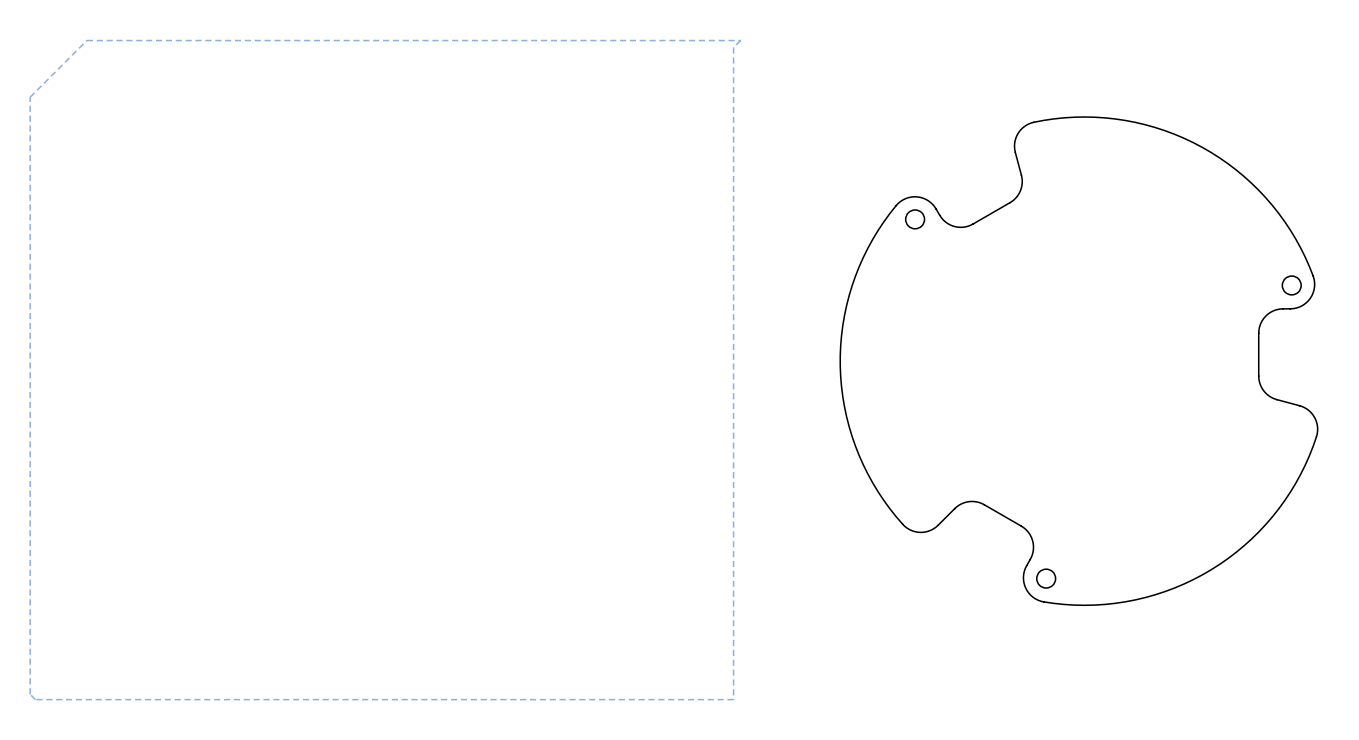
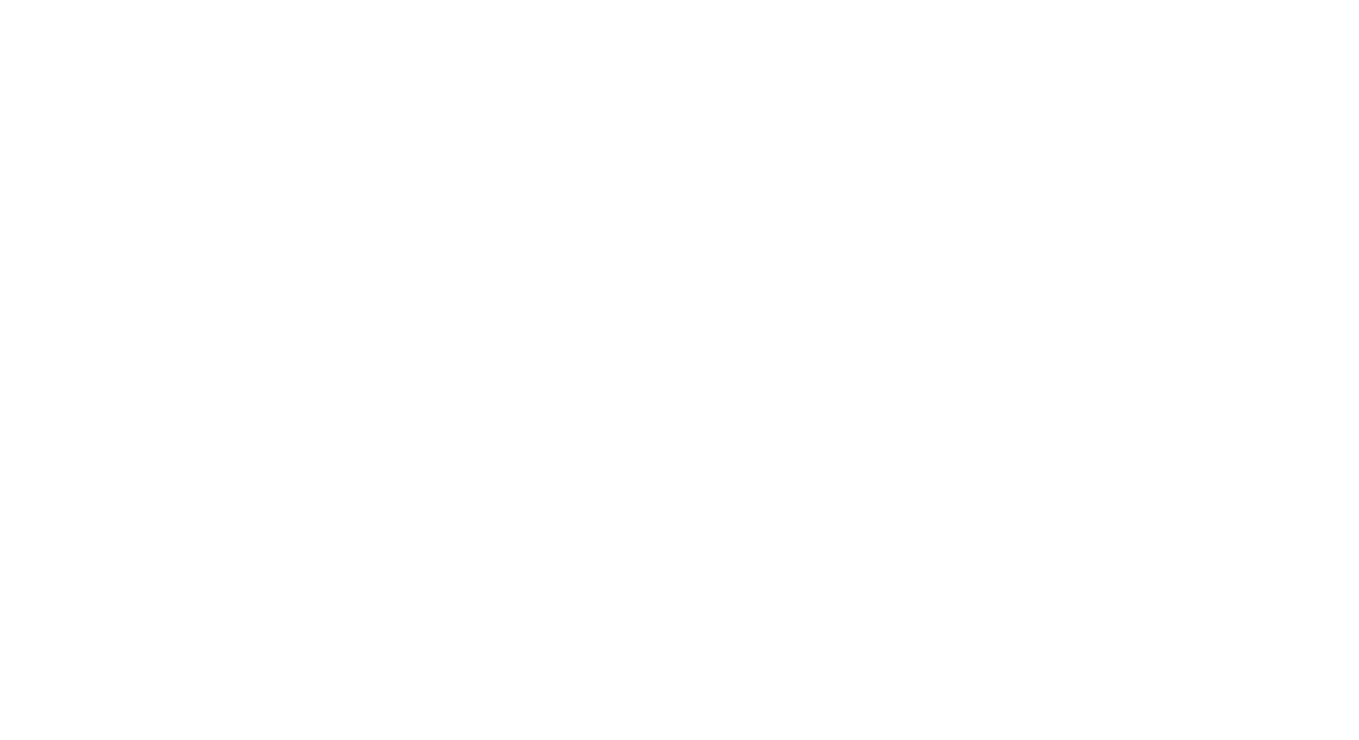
zone outline: (740, 40) (86, 40) (30, 97) (30, 694) (35, 699) (733, 699) (733, 47) (740, 40) -> none
board edge: (1033, 122) (1074, 117) (1115, 118) (1155, 127) (1202, 147) (1243, 176) (1272, 205) (1295, 238) (1313, 278) (1313, 290) (1306, 302) (1296, 308) (1279, 309) (1270, 312) (1262, 321) (1258, 330) (1258, 378) (1262, 388) (1271, 397) (1307, 409) (1316, 422) (1316, 436) (1295, 483) (1265, 524) (1227, 558) (1183, 584) (1135, 599) (1084, 605) (1053, 603) (1035, 598) (1027, 590) (1023, 579) (1024, 571) (1033, 551) (1030, 535) (1021, 526) (979, 502) (968, 501) (961, 503) (936, 527) (928, 531) (917, 532) (906, 528) (883, 500) (867, 474) (855, 446) (846, 416) (840, 366) (844, 315) (859, 266) (878, 230) (898, 203) (911, 197) (919, 197) (928, 200) (945, 222) (960, 227) (972, 224) (1012, 201) (1019, 193) (1022, 183) (1014, 149) (1015, 138) (1021, 128) (1033, 122) -> none
round board edge: [904, 209, 926, 230] -> none
round board edge: [1281, 275, 1302, 296] -> none
round board edge: [1036, 568, 1057, 589] -> none

